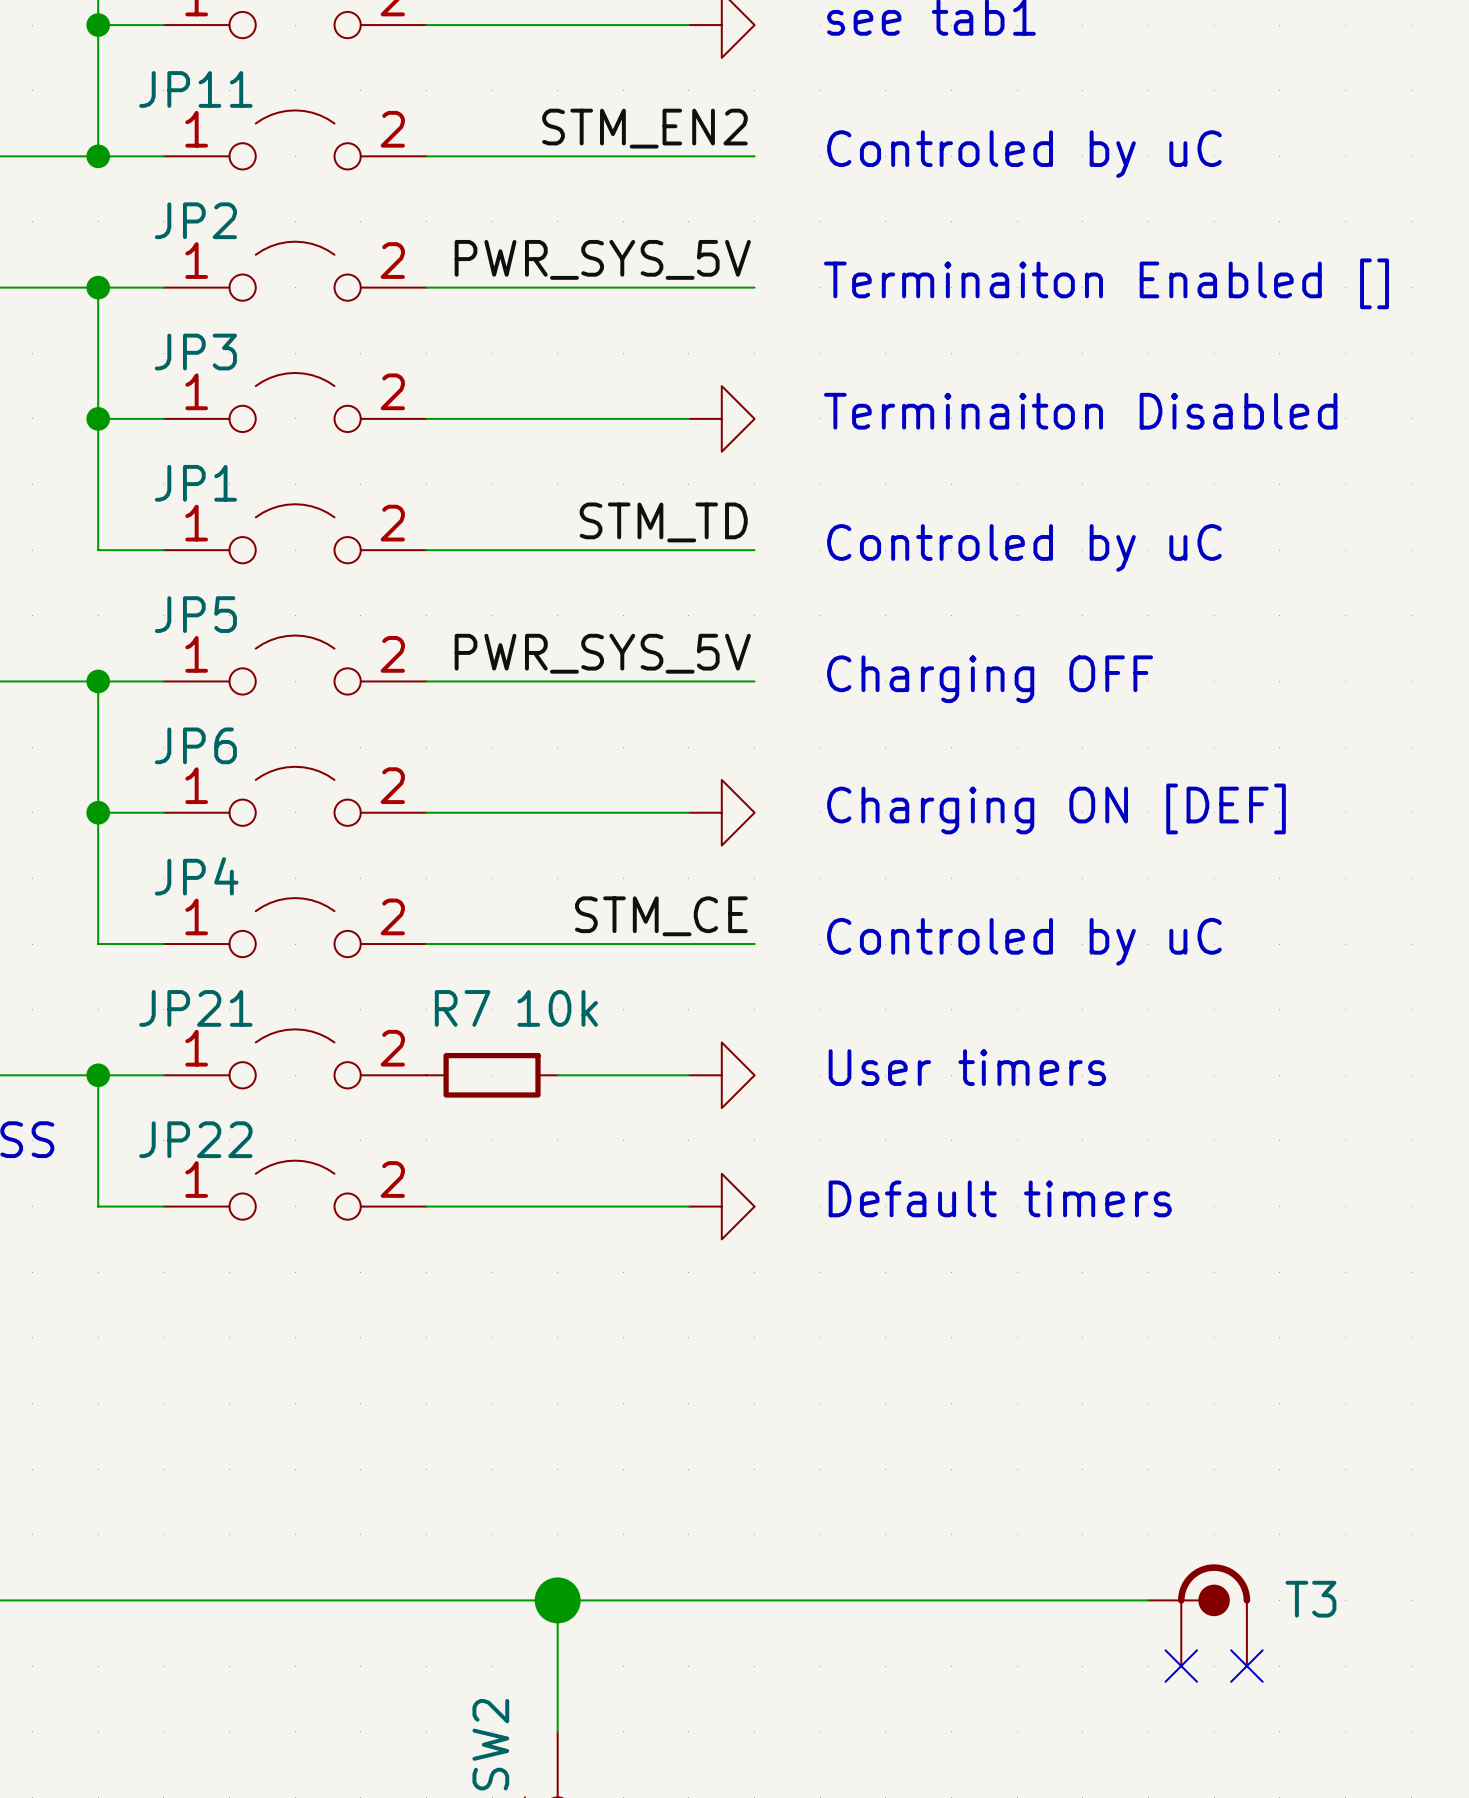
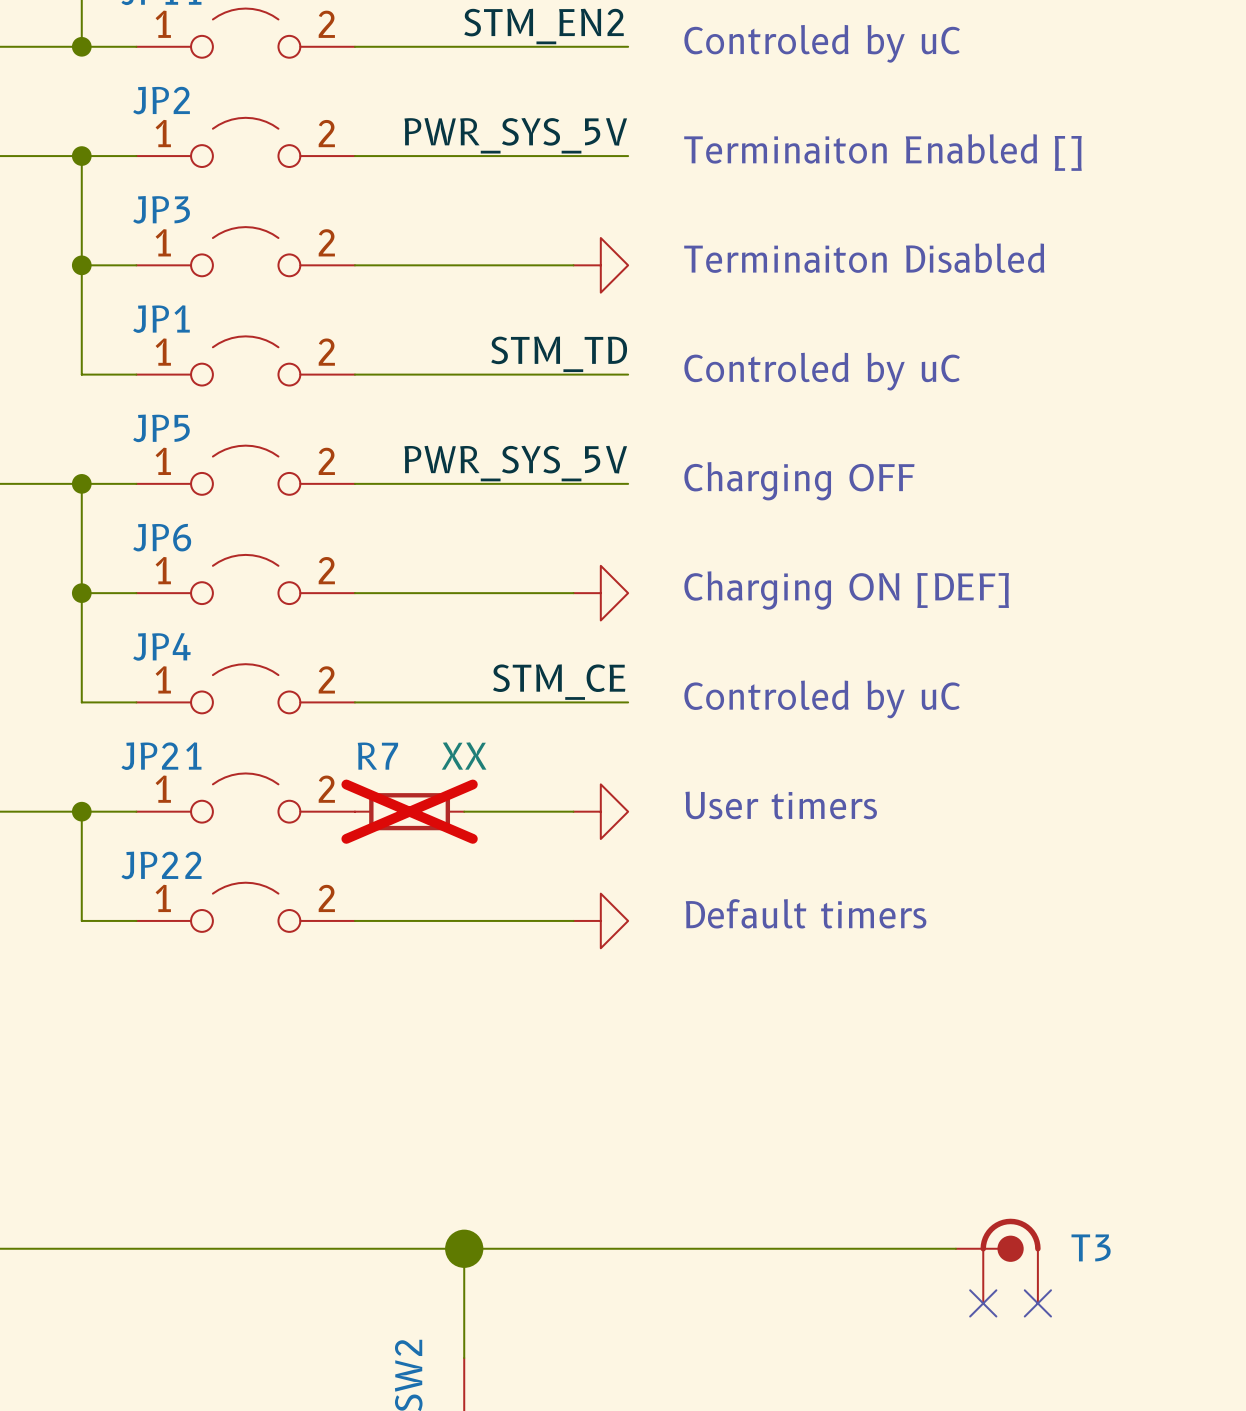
R7 value: 10k (557, 1008) -> XX (464, 756)
R7 do-not-place cross: none -> (409, 811)

